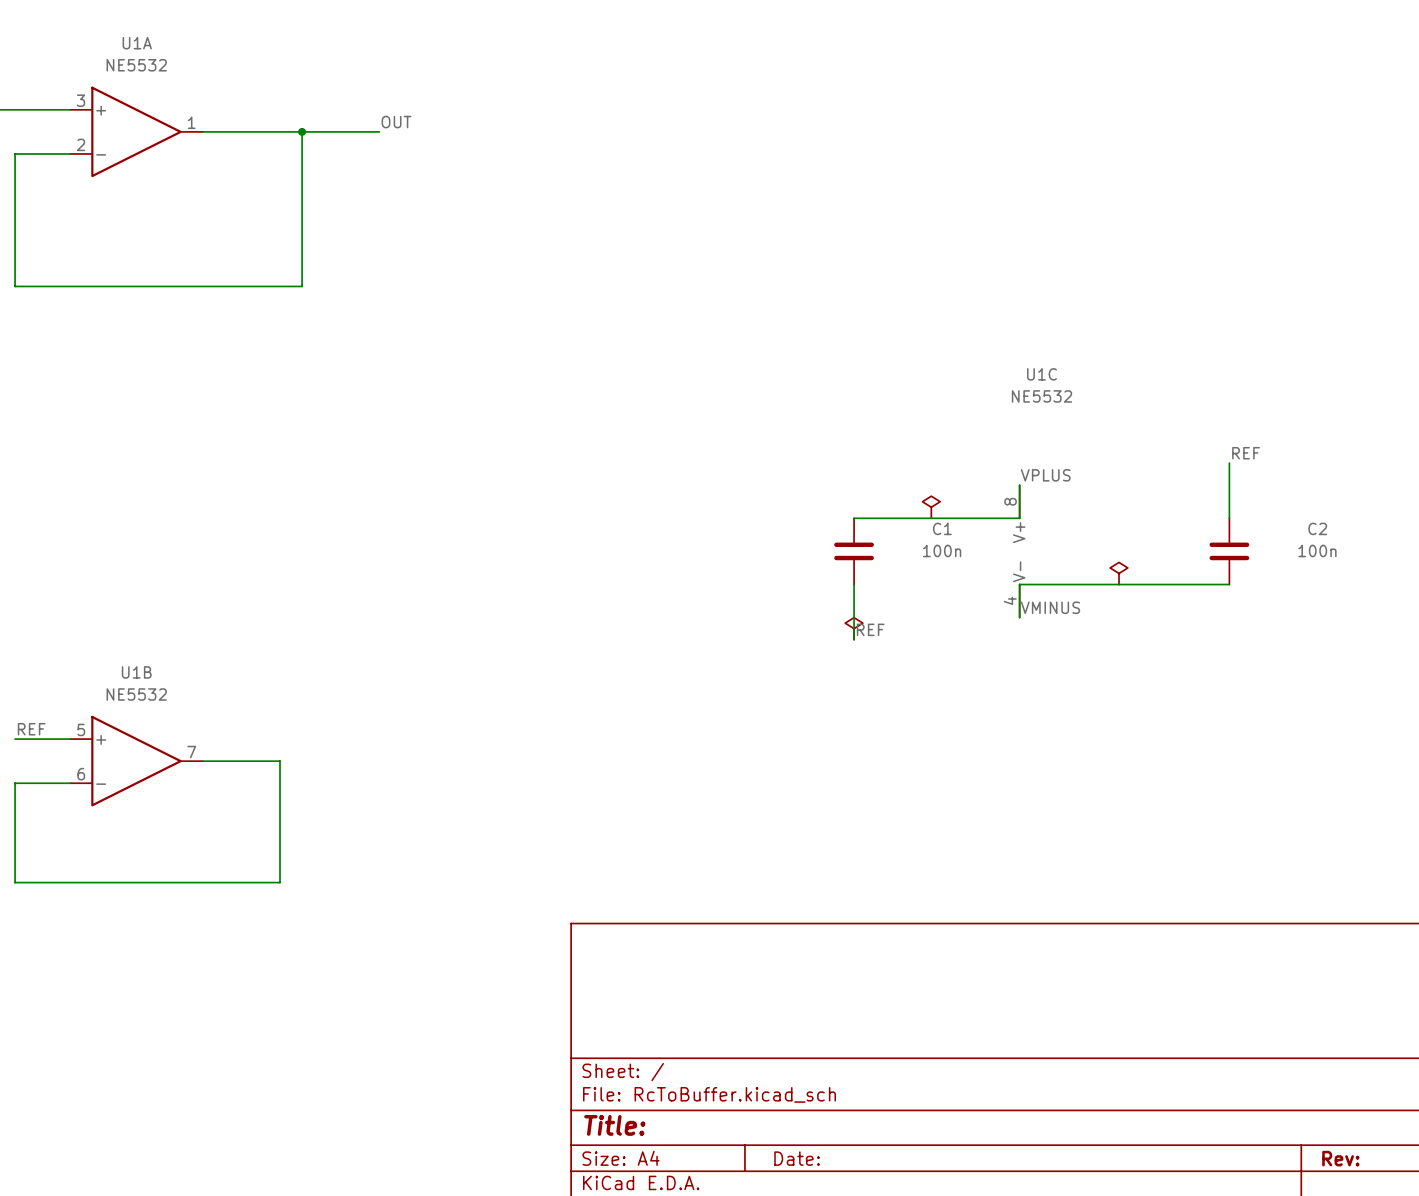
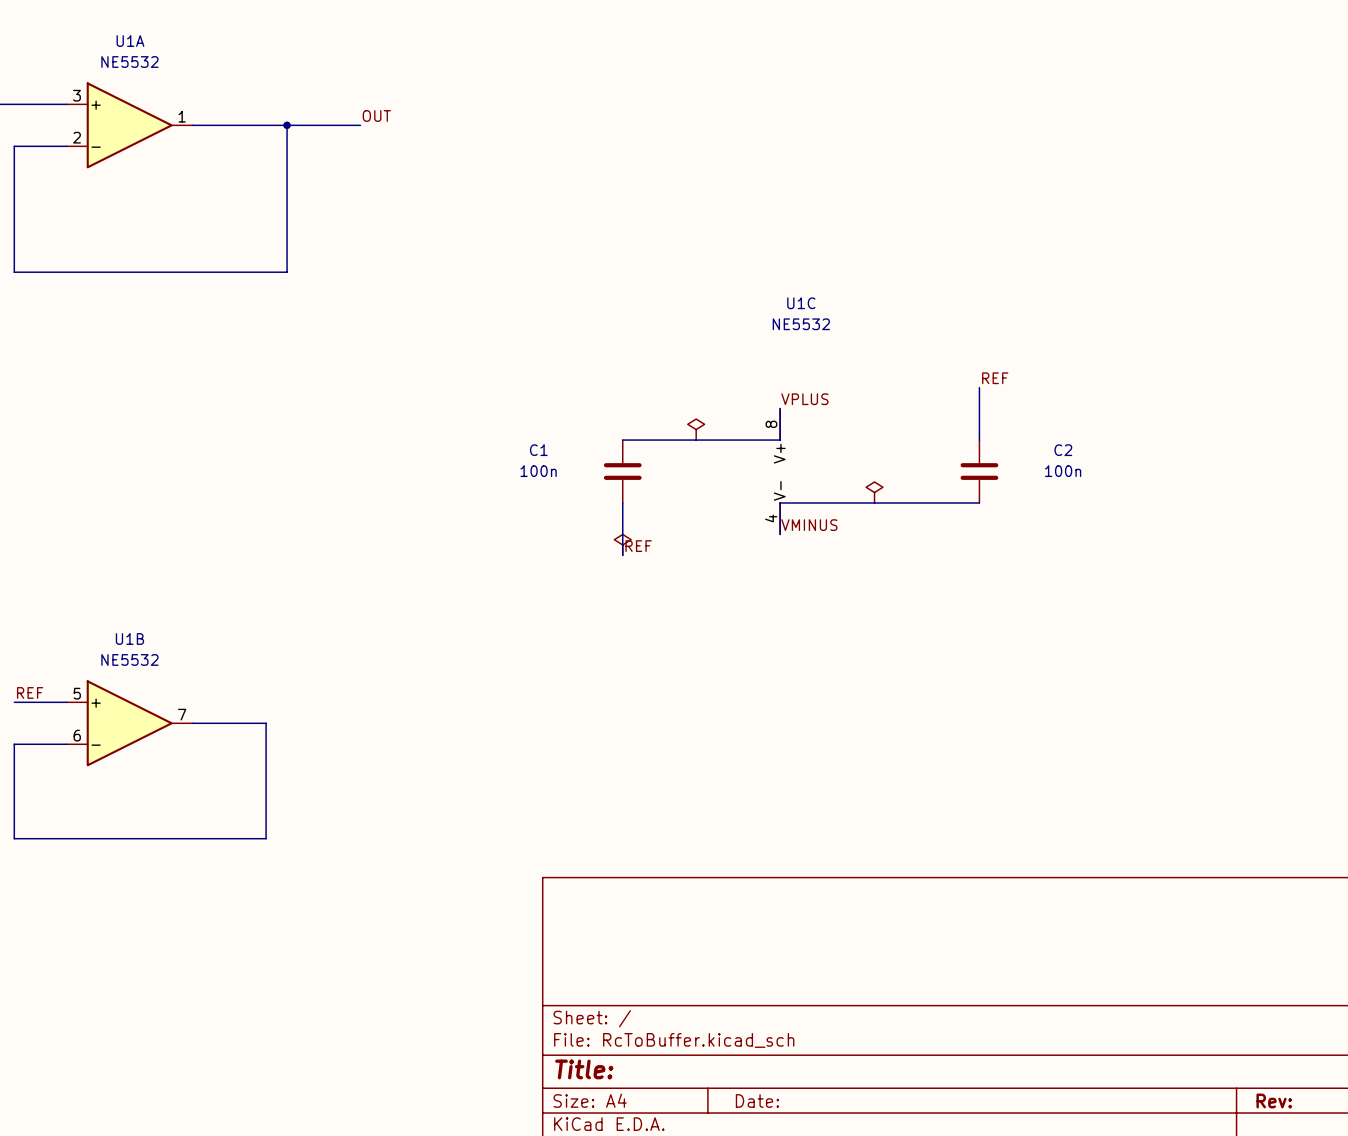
label: none -> REF (995, 378)
power symbol: none -> (696, 429)
label: REF (1246, 453) -> none
wire: (1229, 463) (1229, 518) -> (979, 387) (979, 440)
label position: VPLUS (1045, 475) -> VPLUS (804, 399)
wire: (1019, 485) (1019, 518) (854, 518) -> (780, 408) (780, 440) (622, 440)
power symbol position: (931, 507) -> (874, 492)
C1 name position: C1 (942, 528) -> C1 (538, 450)
C1 value position: 100n (942, 550) -> 100n (538, 471)
C1 position: (854, 551) -> (622, 471)
U1C position: (1019, 551) -> (780, 471)
C2 position: (1229, 551) -> (979, 471)
power symbol: none -> (622, 544)
power symbol: (1119, 573) -> none
label: none -> REF (638, 546)
wire: (854, 584) (854, 639) -> (622, 503) (622, 555)
wire: (1229, 584) (1019, 584) (1019, 617) -> (979, 503) (780, 503) (780, 534)
label position: VMINUS (1050, 607) -> VMINUS (809, 525)
power symbol: (854, 628) -> none
label: REF (870, 629) -> none

